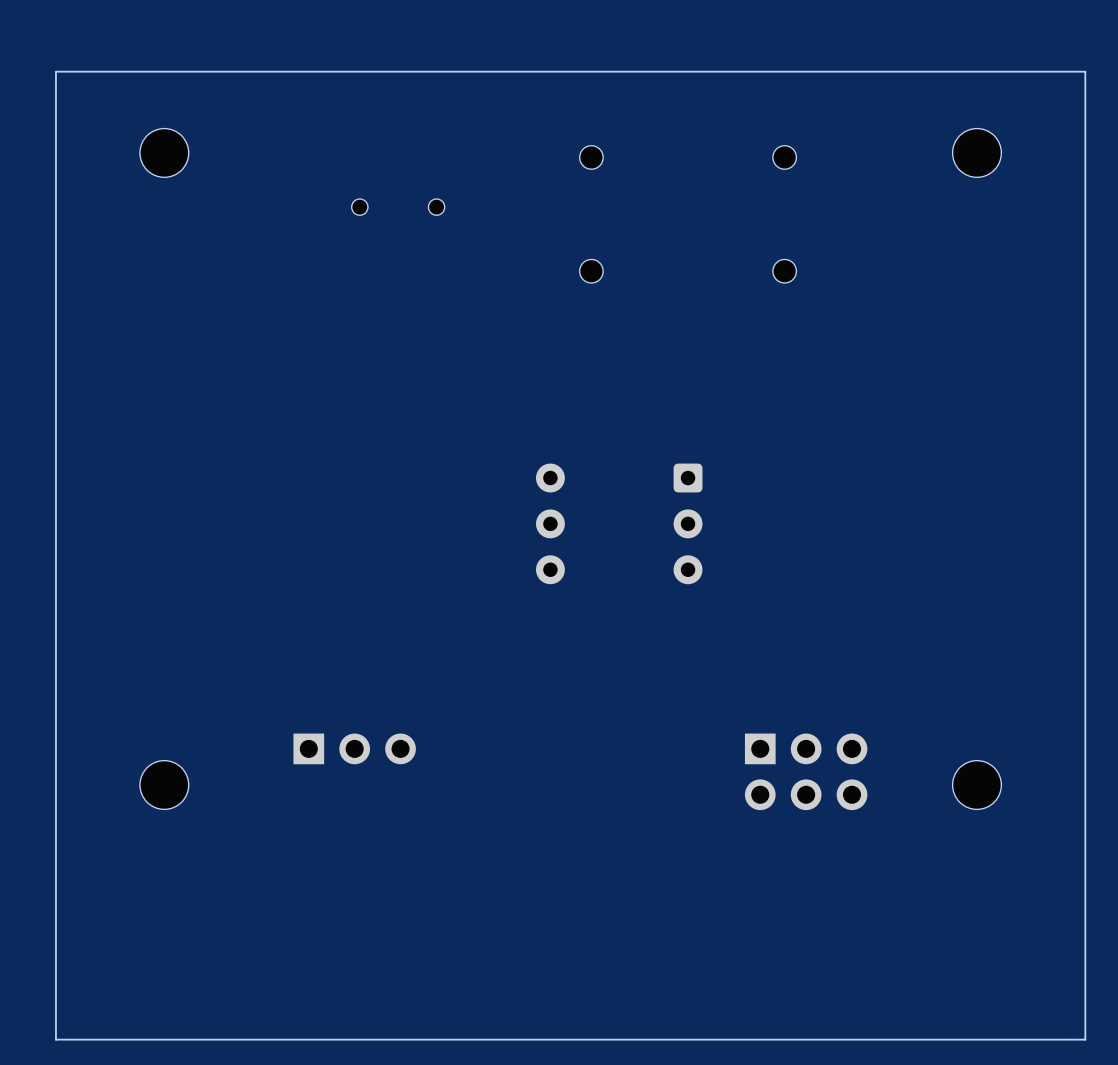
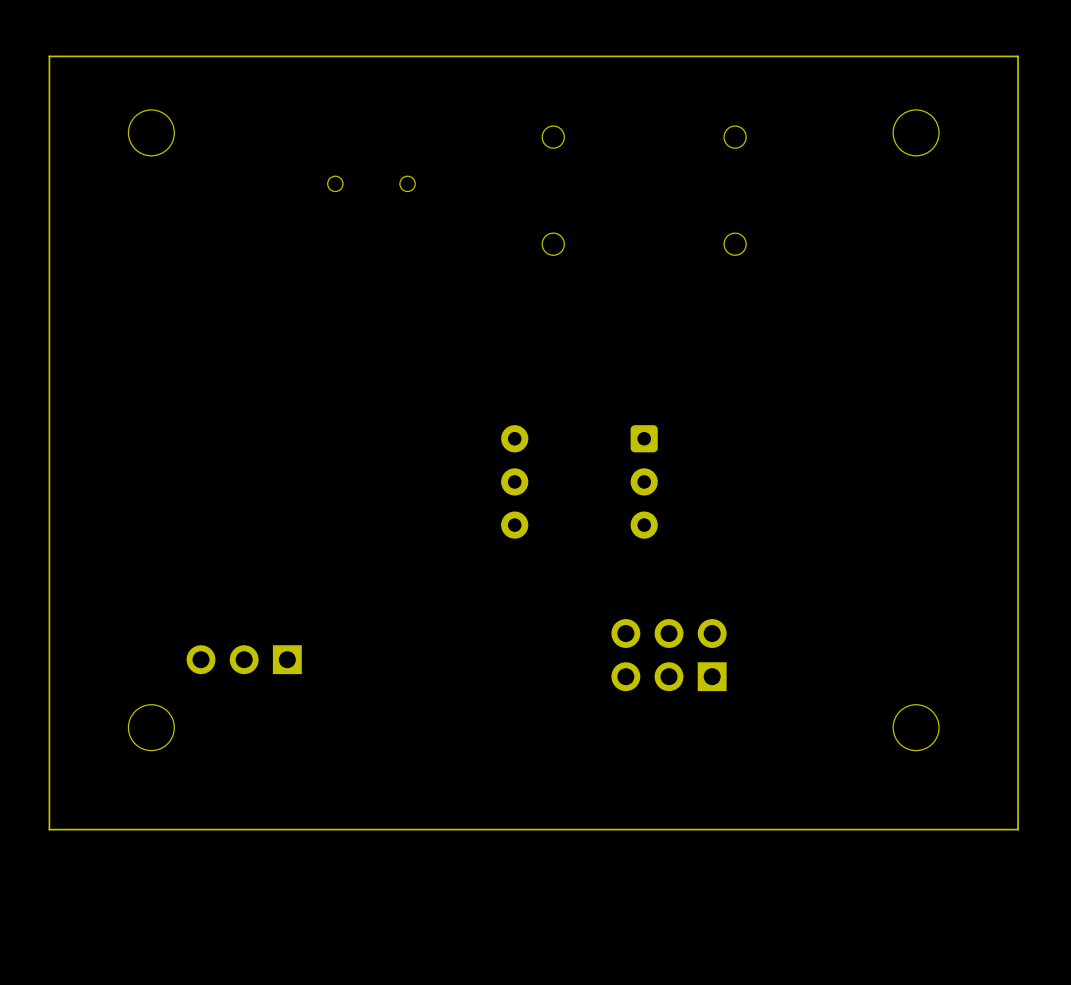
part rotation: 0° (354, 748) -> 180° (244, 659)
part position: (354, 748) -> (244, 659)
part rotation: 0° (806, 771) -> 180° (669, 655)
part position: (806, 771) -> (669, 655)
board edge: (1085, 893) (1085, 1039) (55, 1039) (55, 893) -> (1018, 829) (49, 829)

